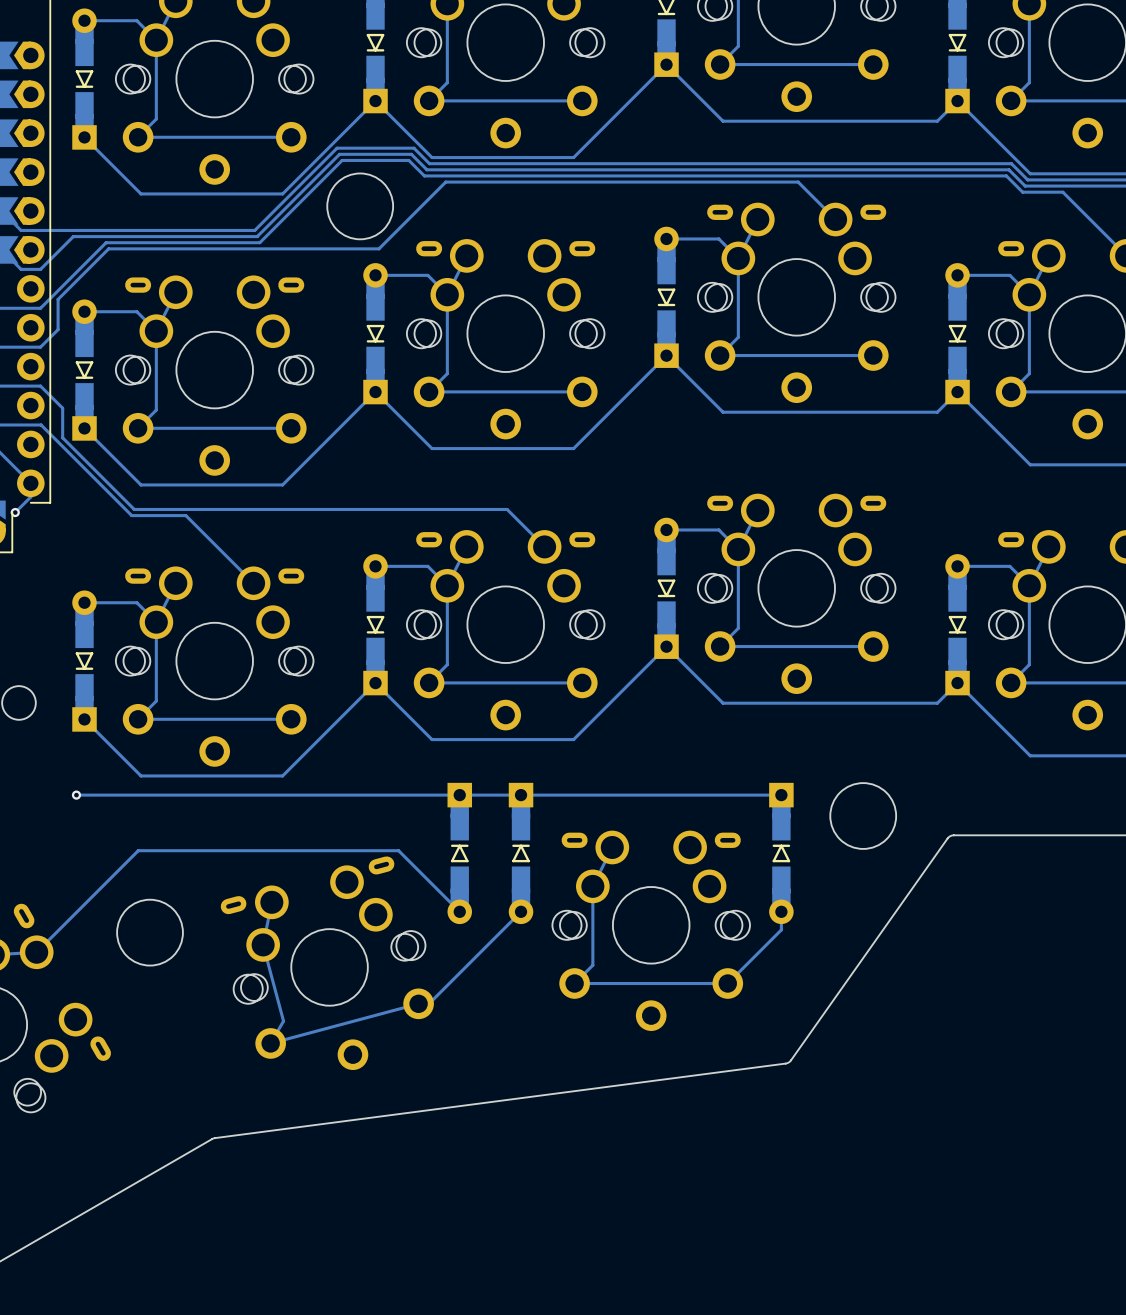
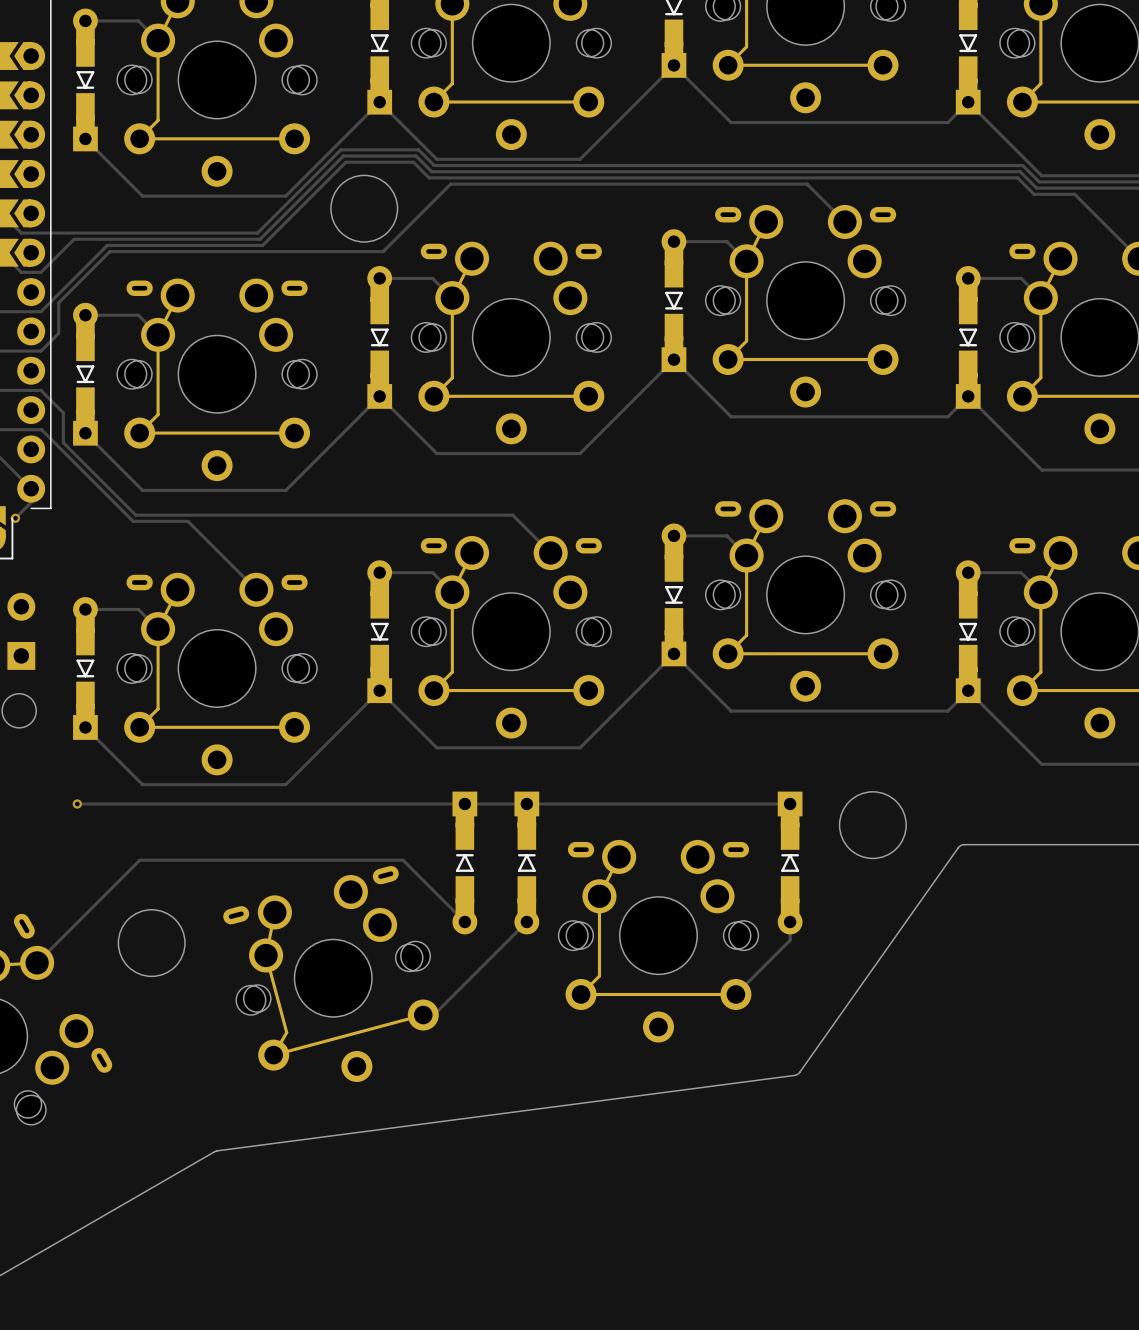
part: none -> (21, 631)

